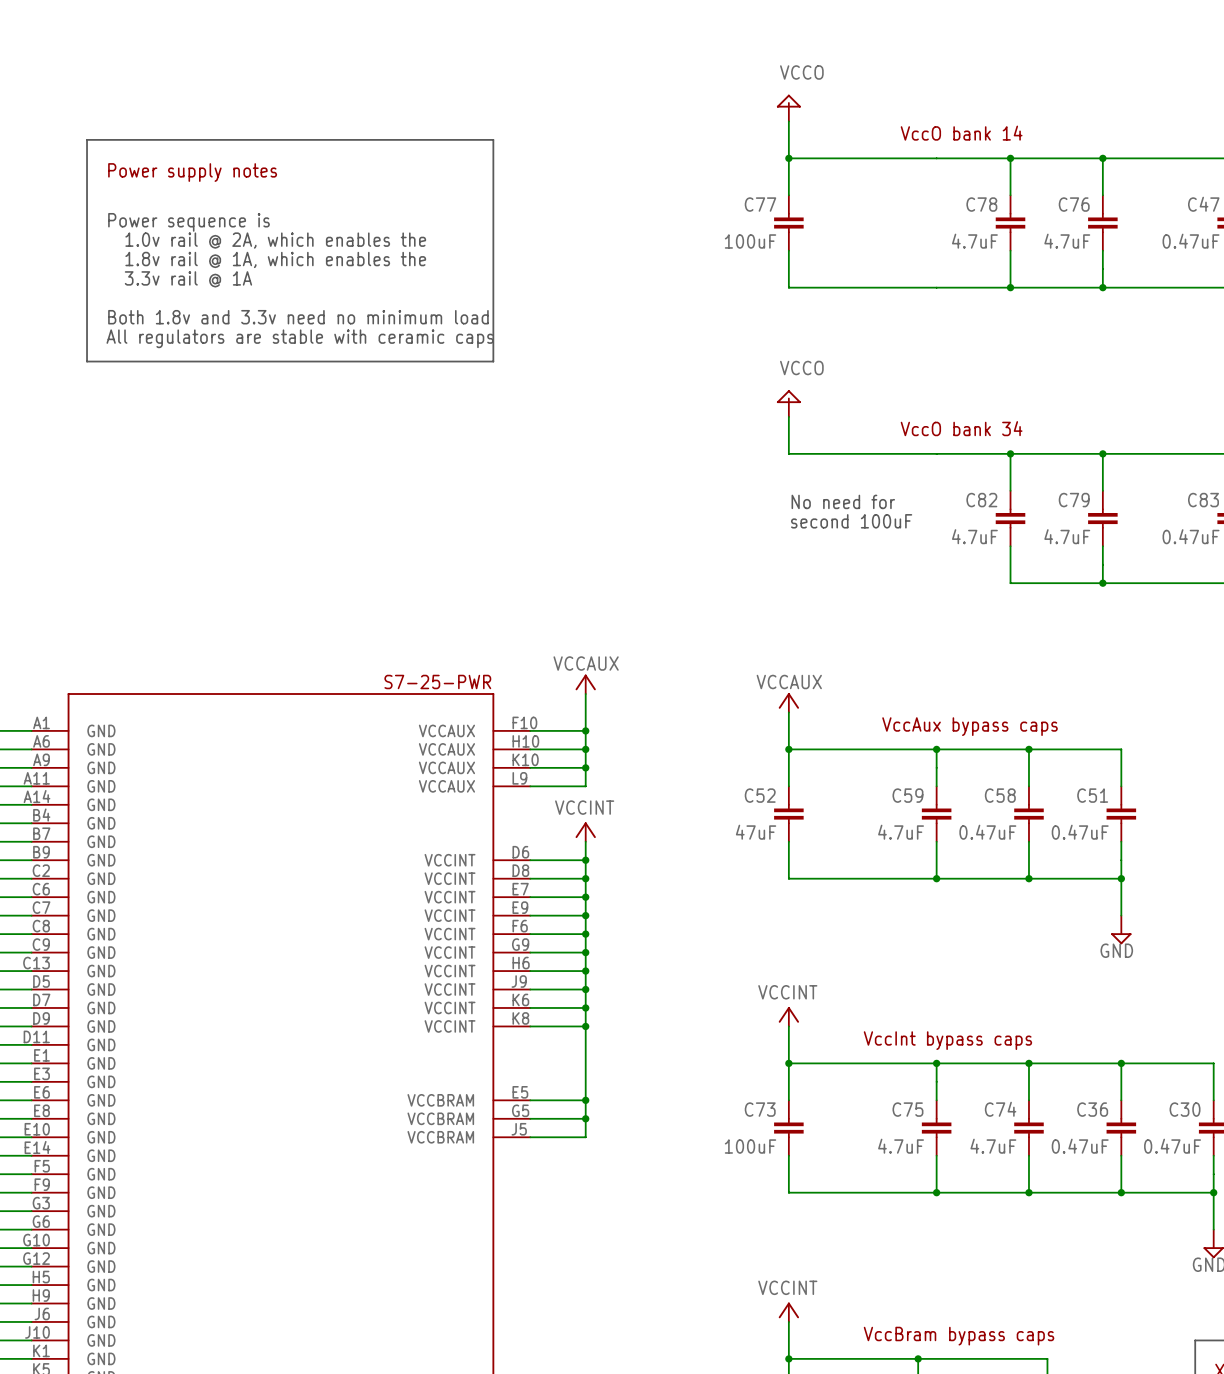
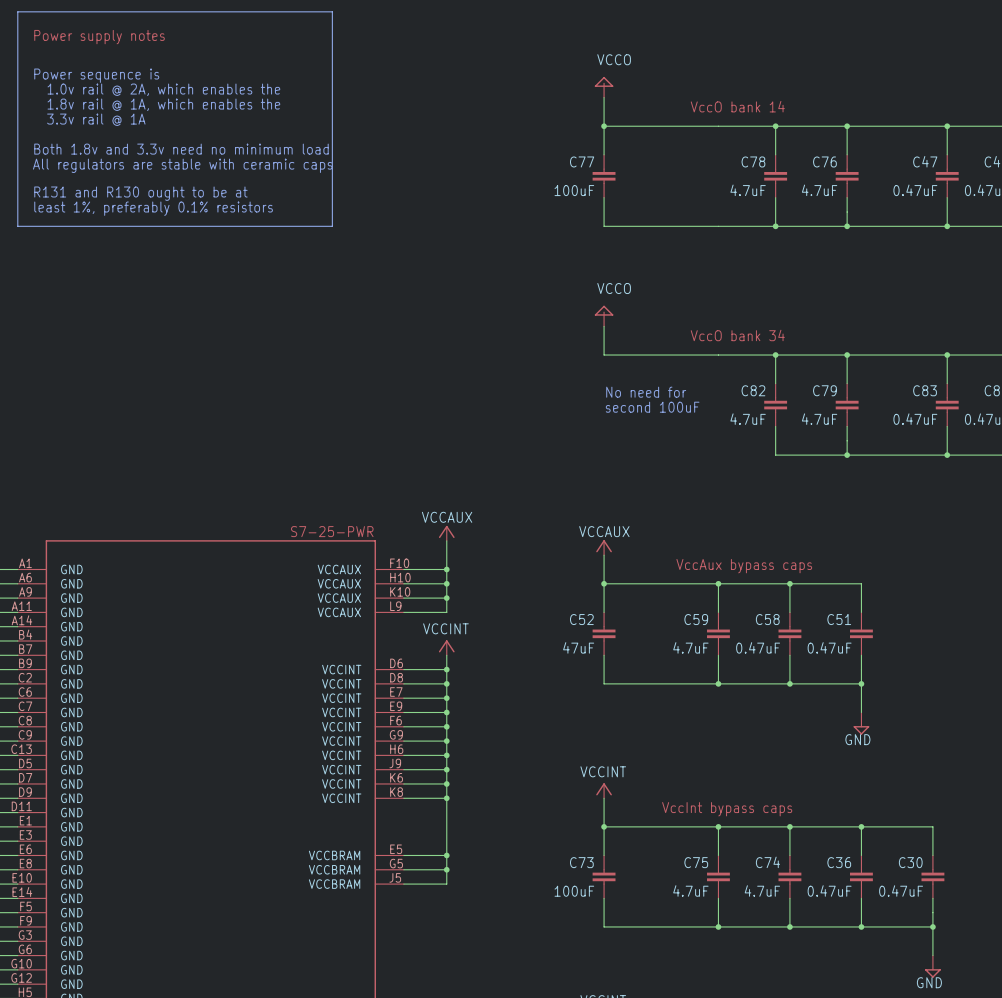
line: none -> (17, 11) (332, 11) (332, 226) (17, 226) (17, 11)
line: (87, 139) (493, 139) (493, 361) (87, 361) (87, 139) -> none
text position: Power supply notes (192, 172) -> Power supply notes (99, 37)
text position: Power sequence is (189, 222) -> Power sequence is (96, 75)
text position: 1.0v rail @ 2A, which enables the (275, 240) -> 1.0v rail @ 2A, which enables the (163, 89)
text: none -> R131 and R130 ought to be at (140, 193)
text position: 1.8v rail @ 1A, which enables the (275, 259) -> 1.8v rail @ 1A, which enables the (163, 104)
text: none -> least 1%, preferably 0.1% resistors (153, 208)
text position: 3.3v rail @ 1A (188, 279) -> 3.3v rail @ 1A (96, 119)
text position: Both 1.8v and 3.3v need no minimum load (298, 317) -> Both 1.8v and 3.3v need no minimum load (181, 149)
text position: All regulators are stable with ceramic caps (300, 338) -> All regulators are stable with ceramic caps (182, 165)

